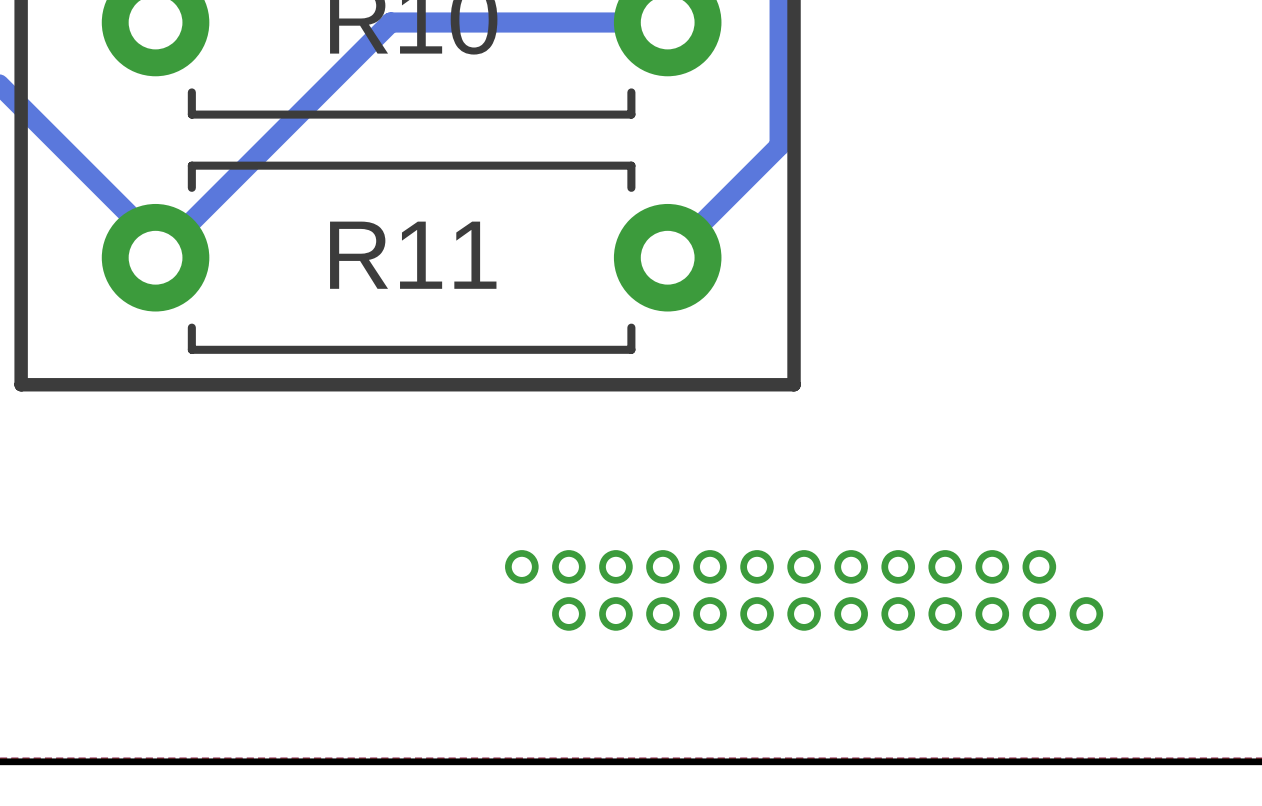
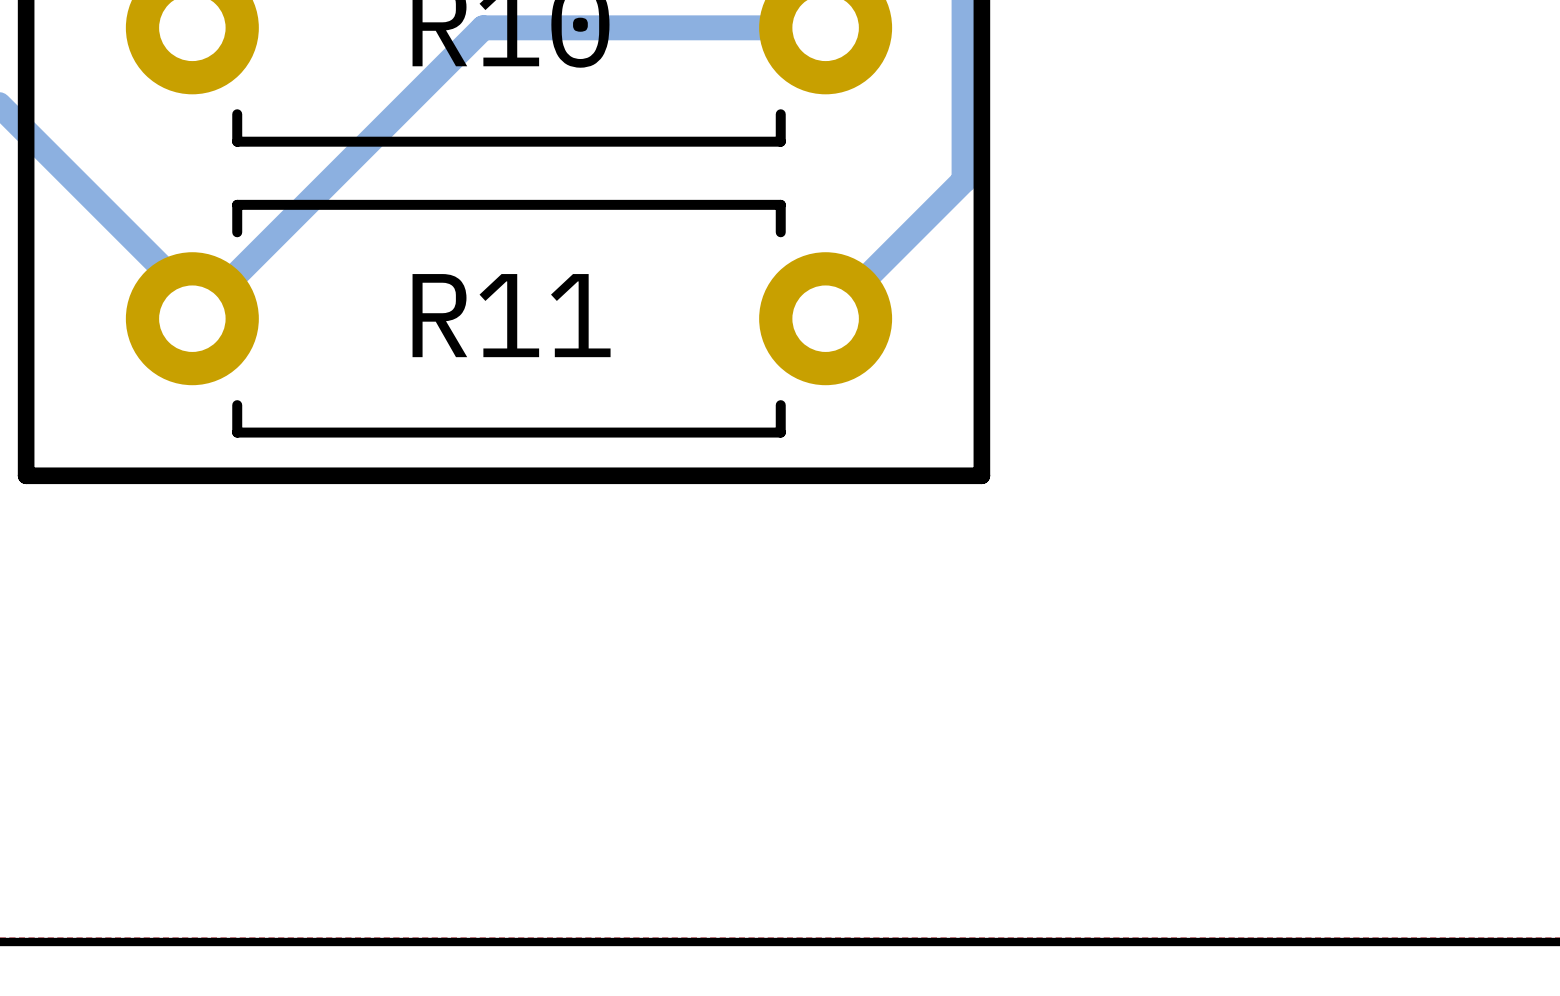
via: (521, 566) -> none
via: (568, 566) -> none
via: (615, 566) -> none
via: (662, 566) -> none
via: (710, 566) -> none
via: (757, 566) -> none
via: (804, 566) -> none
via: (851, 566) -> none
via: (898, 566) -> none
via: (945, 566) -> none
via: (992, 566) -> none
via: (1039, 566) -> none
via: (568, 613) -> none
via: (615, 613) -> none
via: (662, 613) -> none
via: (710, 613) -> none
via: (757, 613) -> none
via: (804, 613) -> none
via: (851, 613) -> none
via: (898, 613) -> none
via: (945, 613) -> none
via: (992, 613) -> none
via: (1039, 613) -> none
via: (1086, 613) -> none

